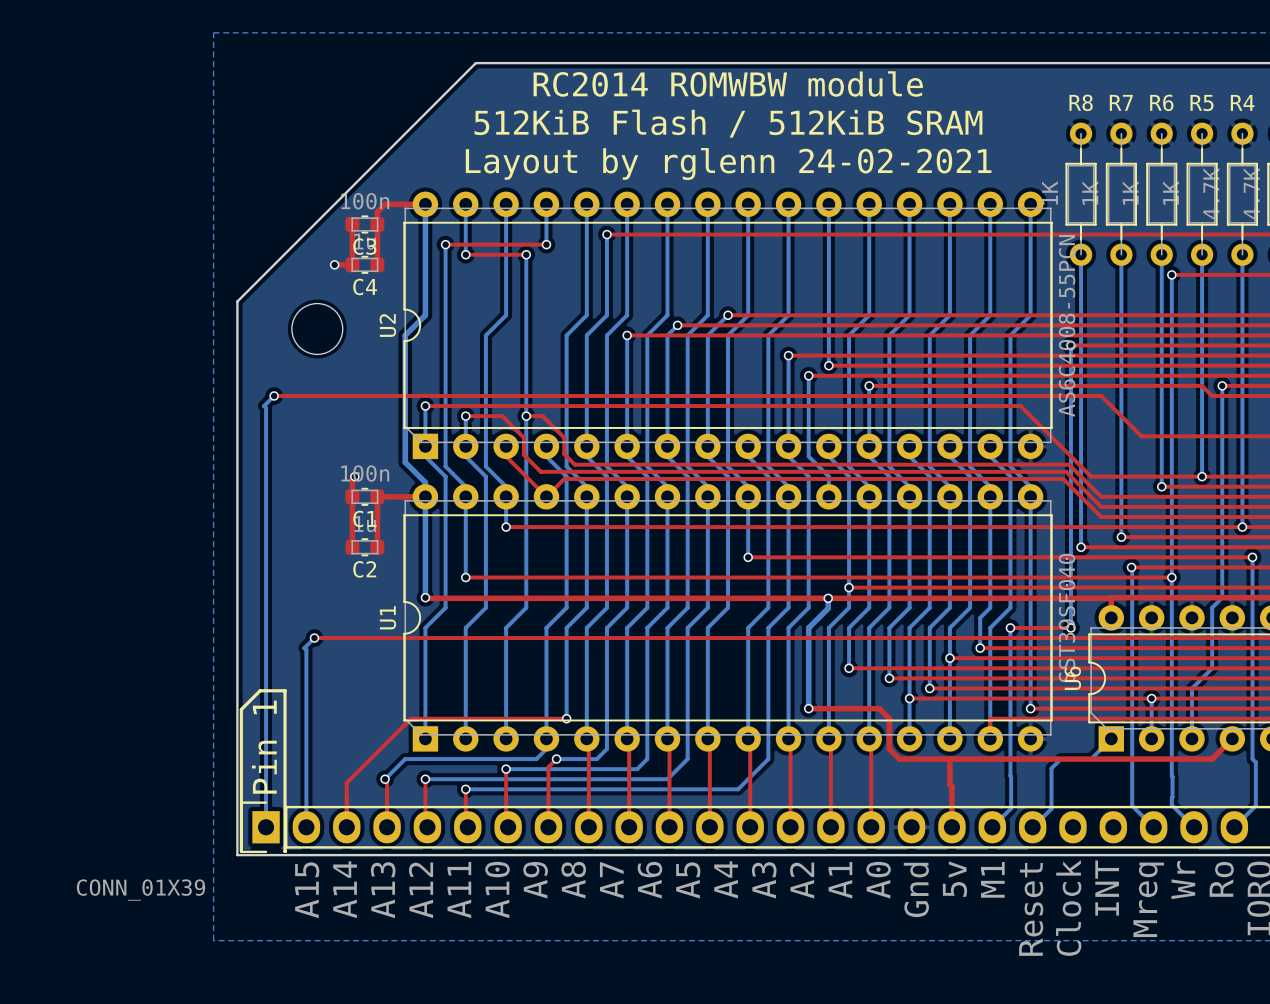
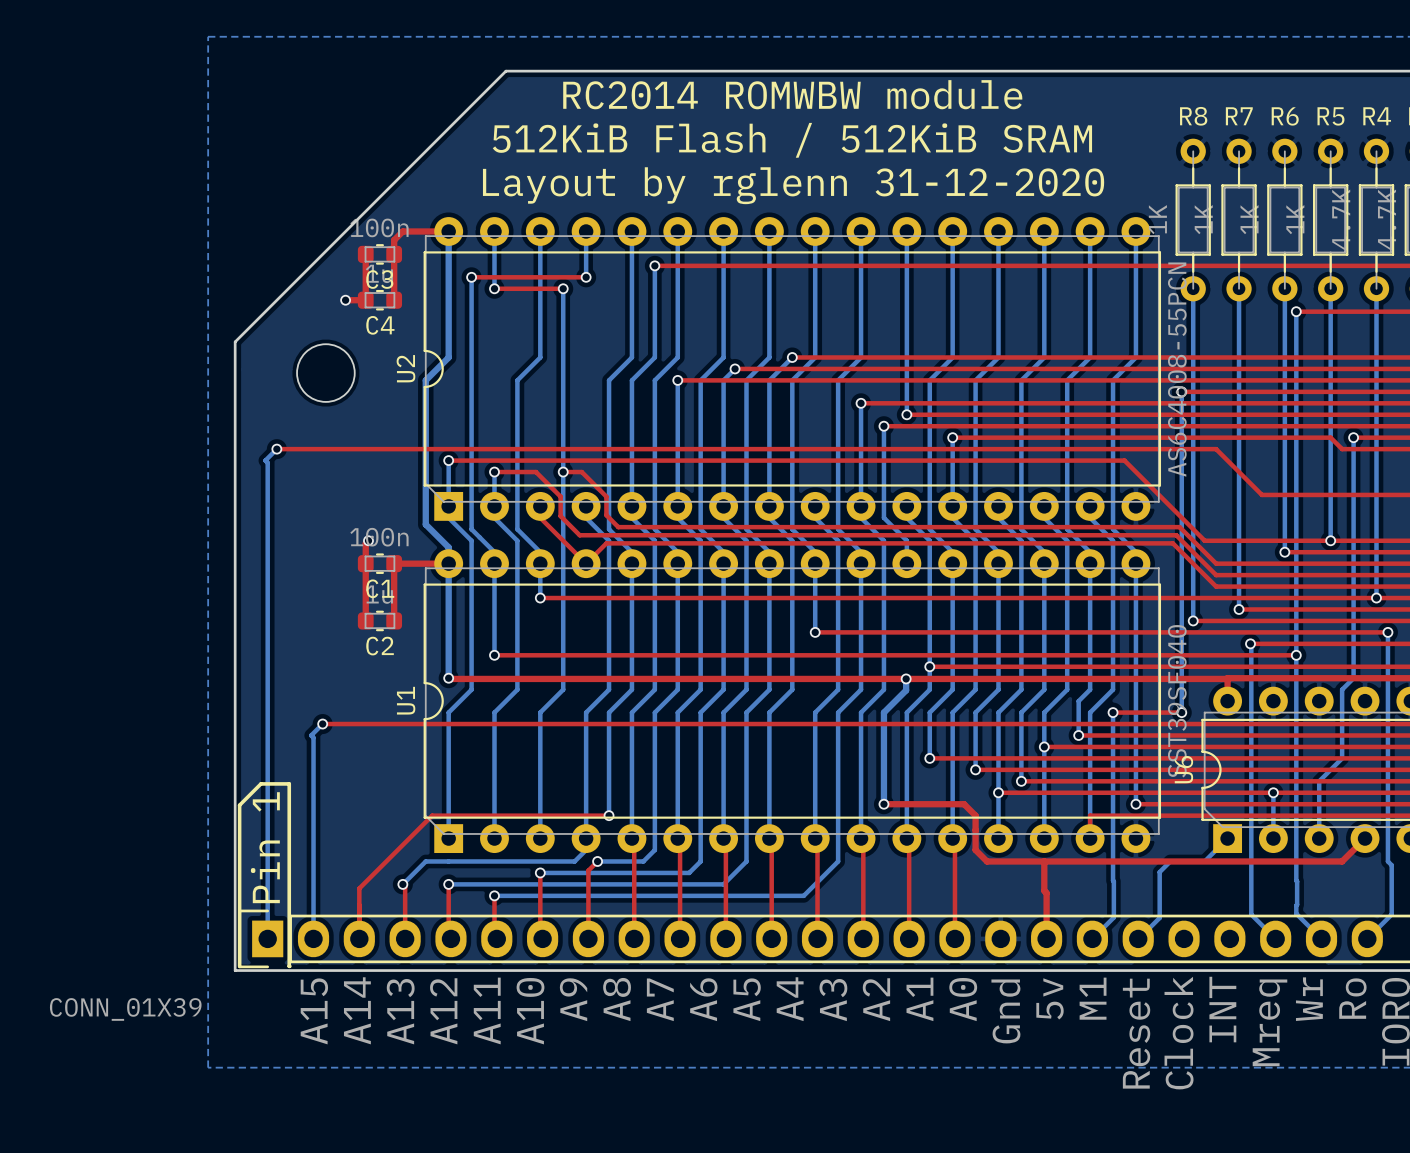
text: Layout by rglenn 24-02-2021 (728, 164) -> Layout by rglenn 31-12-2020 (793, 185)

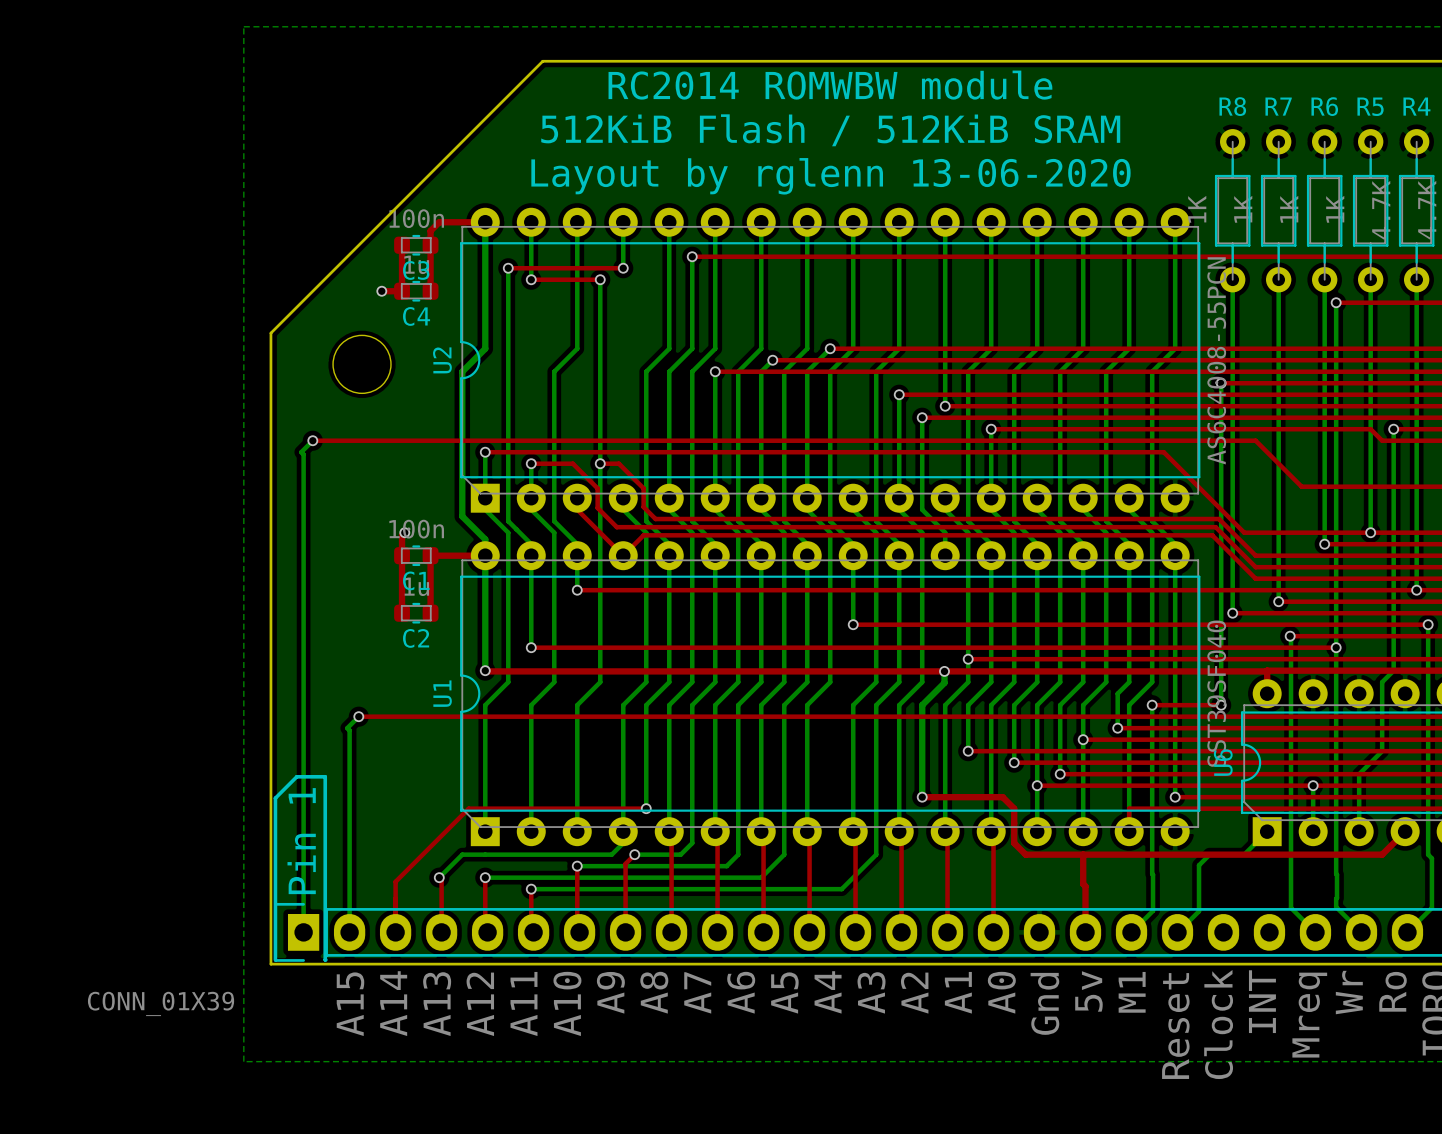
text: Layout by rglenn 31-12-2020 (793, 185) -> Layout by rglenn 13-06-2020 (830, 176)

